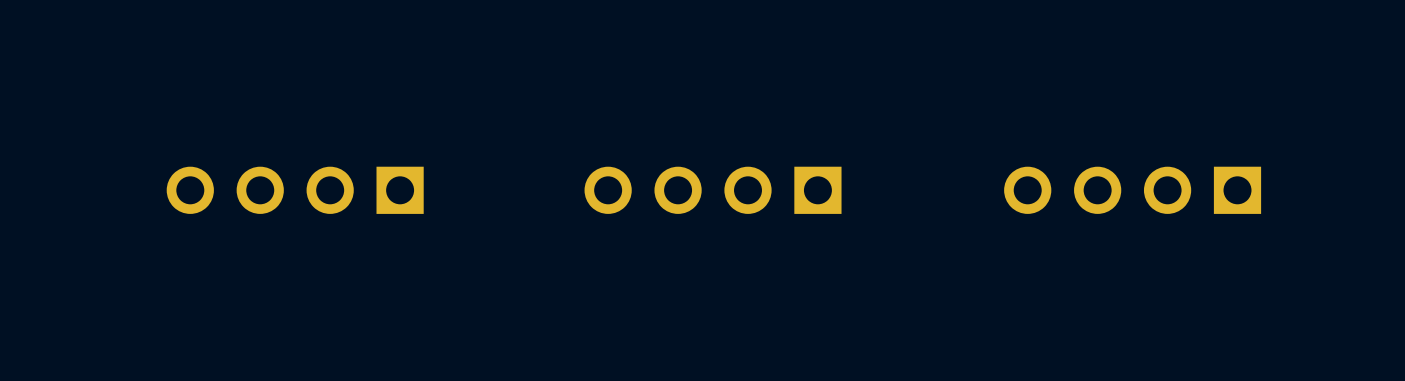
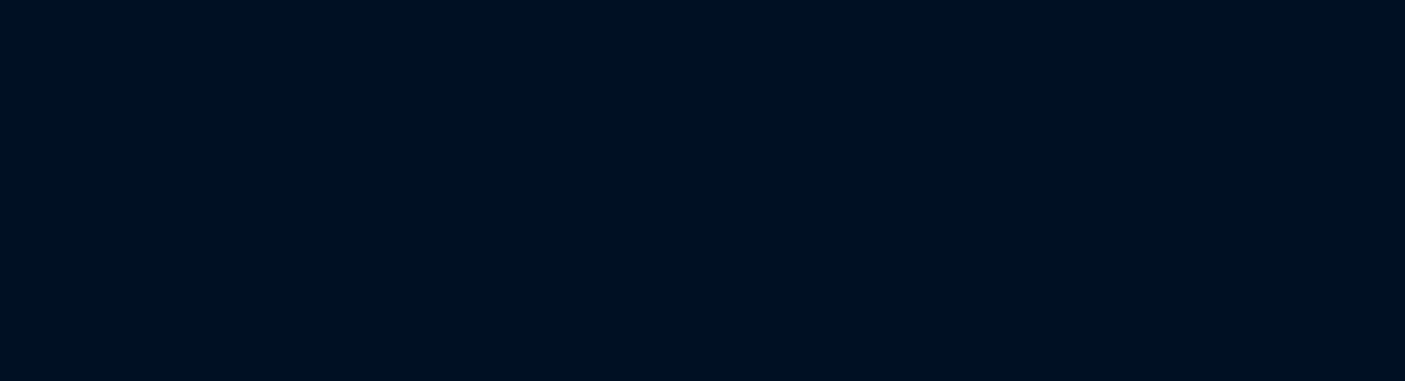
part: (295, 190) -> none
part: (713, 190) -> none
part: (1132, 190) -> none

